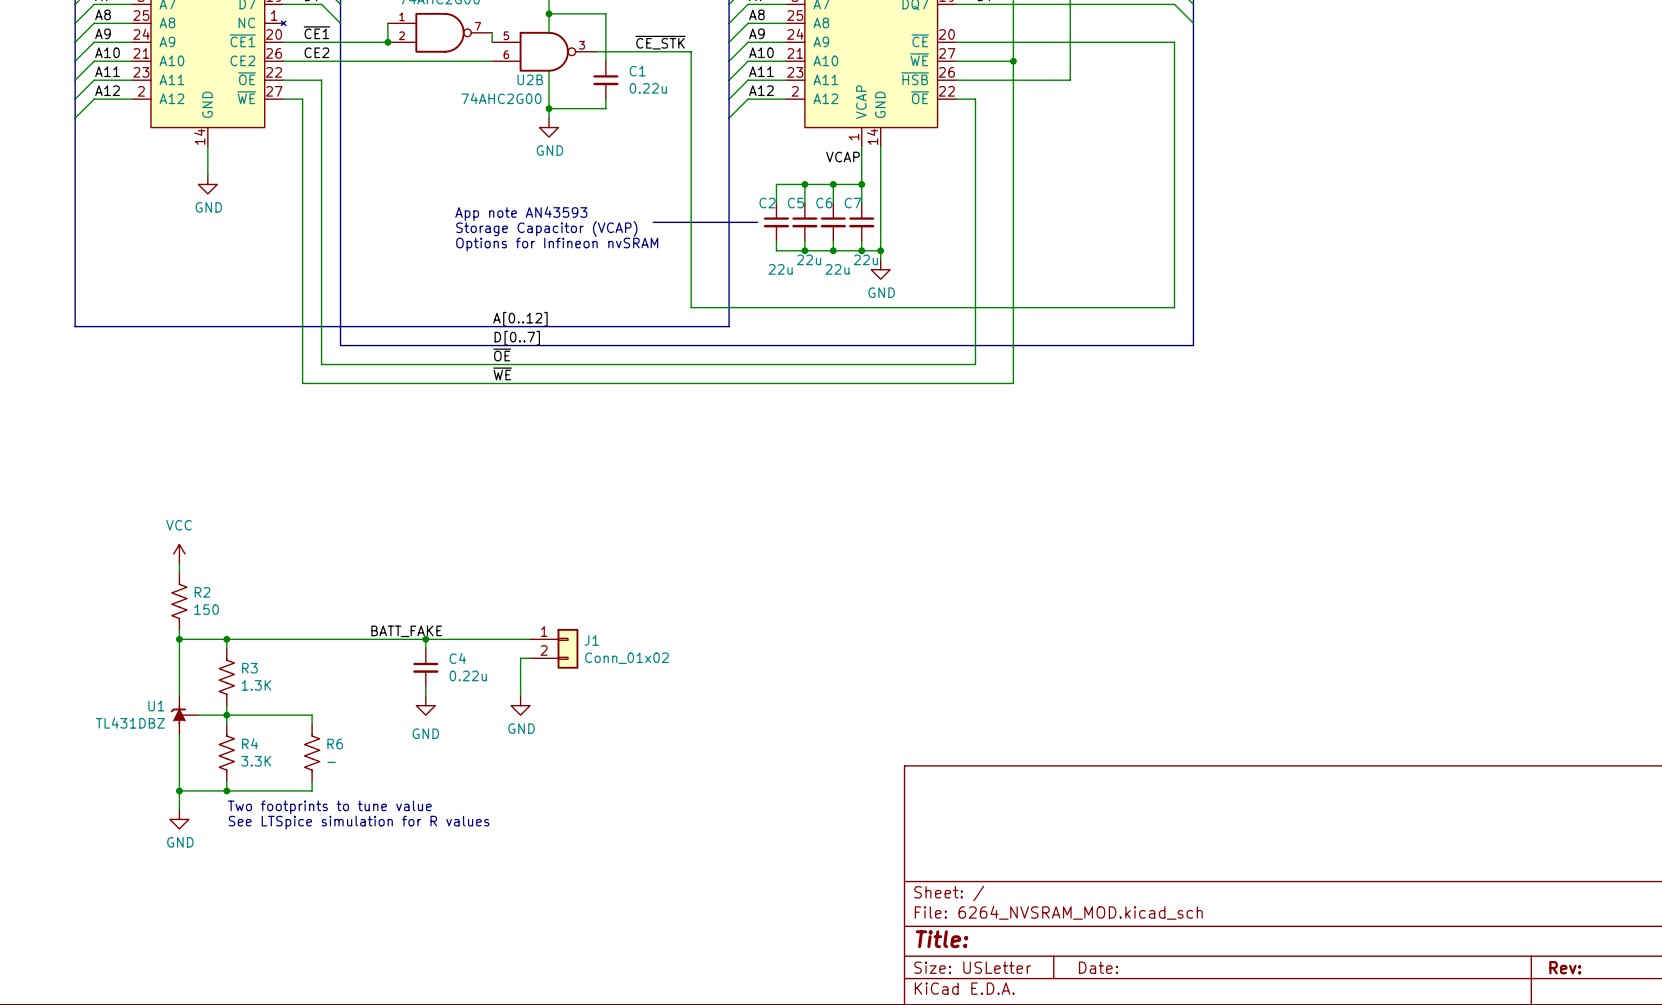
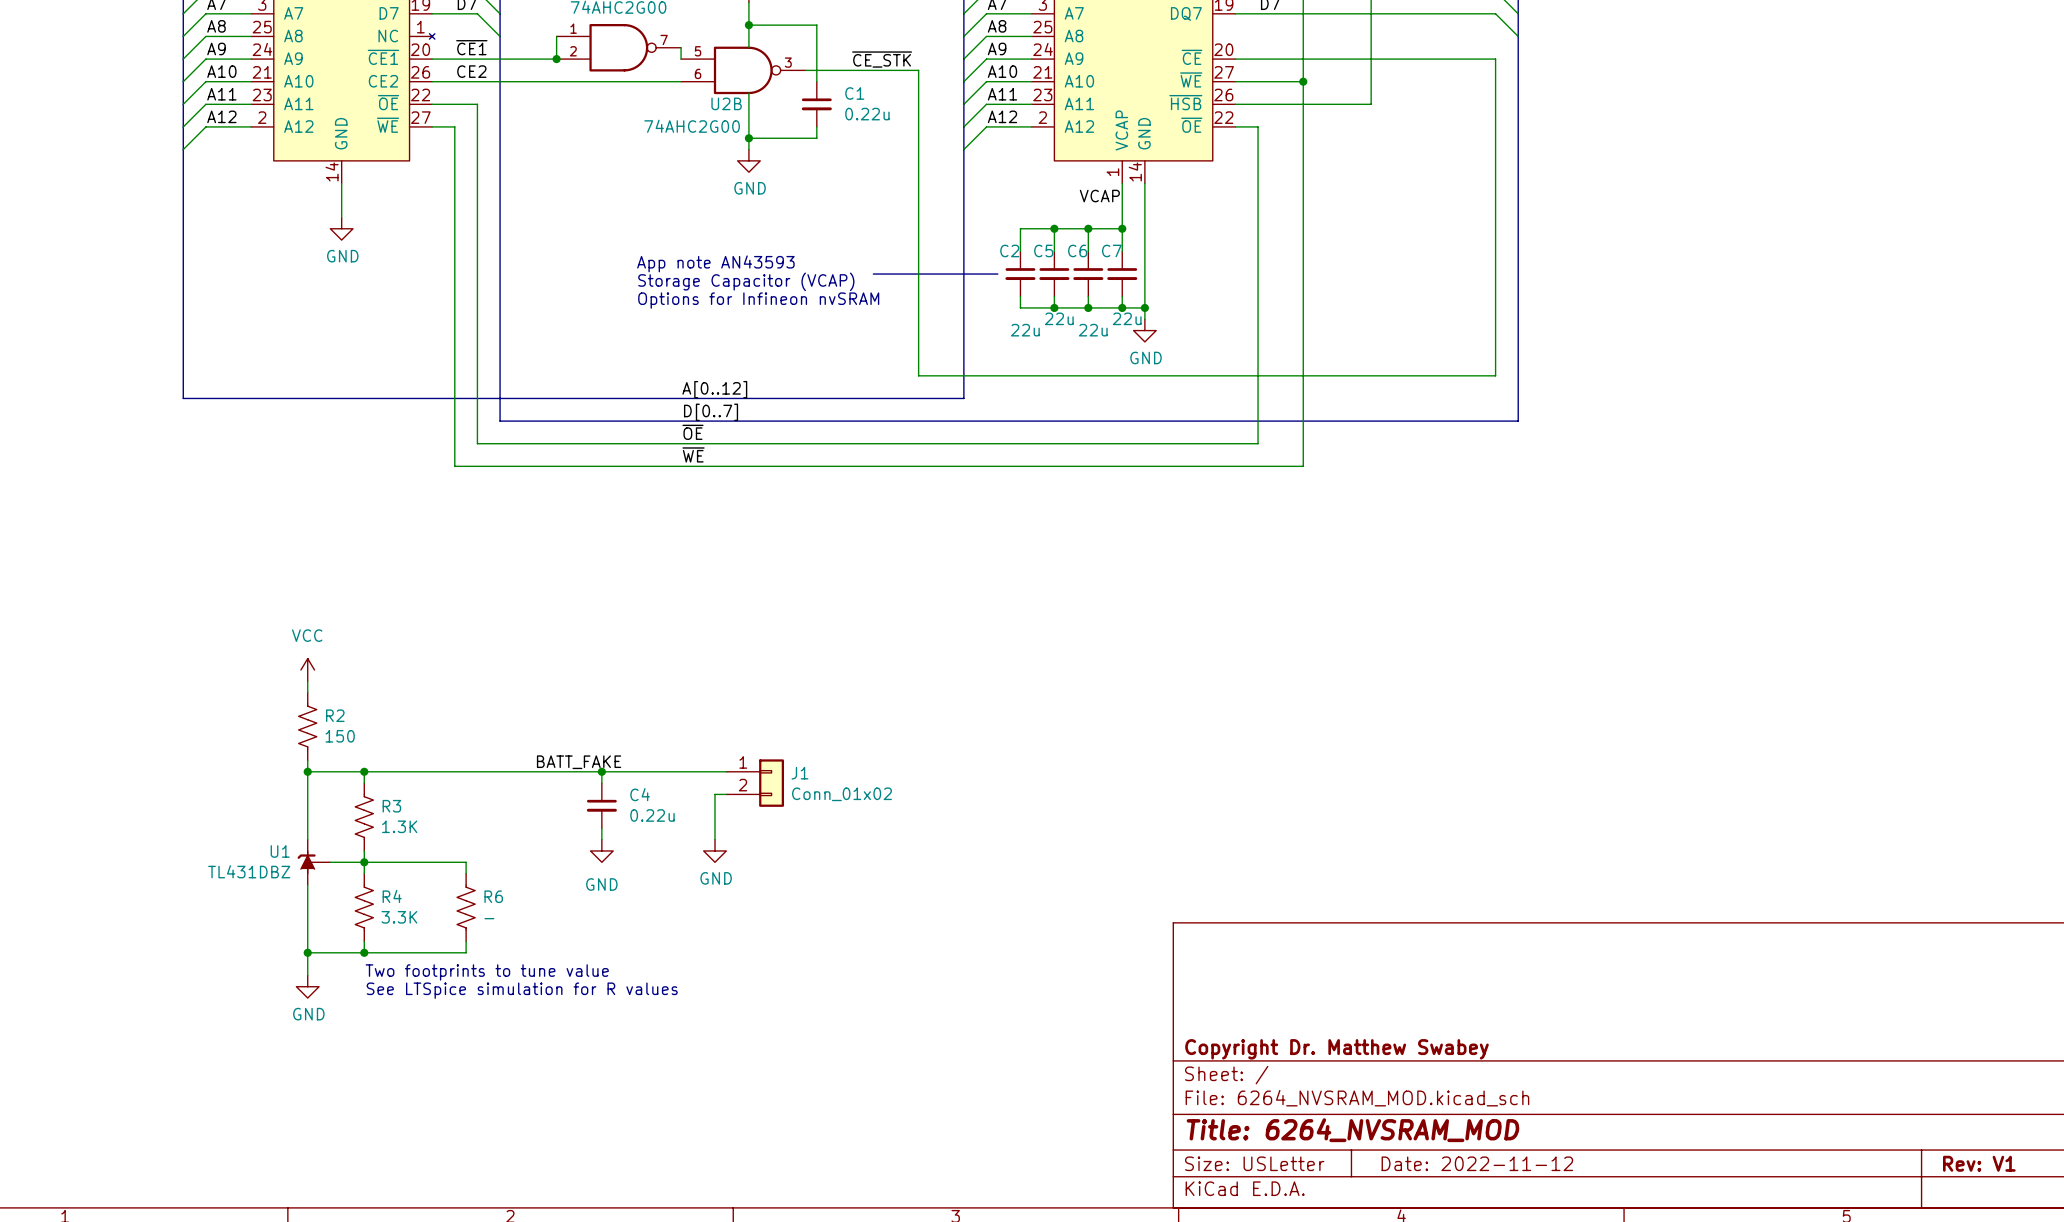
title block: none -> Copyright Dr. Matthew Swabey (1336, 1049)
title block: Title: (942, 939) -> Title: 6264_NVSRAM_MOD (1353, 1130)
title block: Date: (1098, 967) -> Date: 2022-11-12 (1477, 1163)
title block: Rev: (1565, 967) -> Rev: V1 (1979, 1163)

